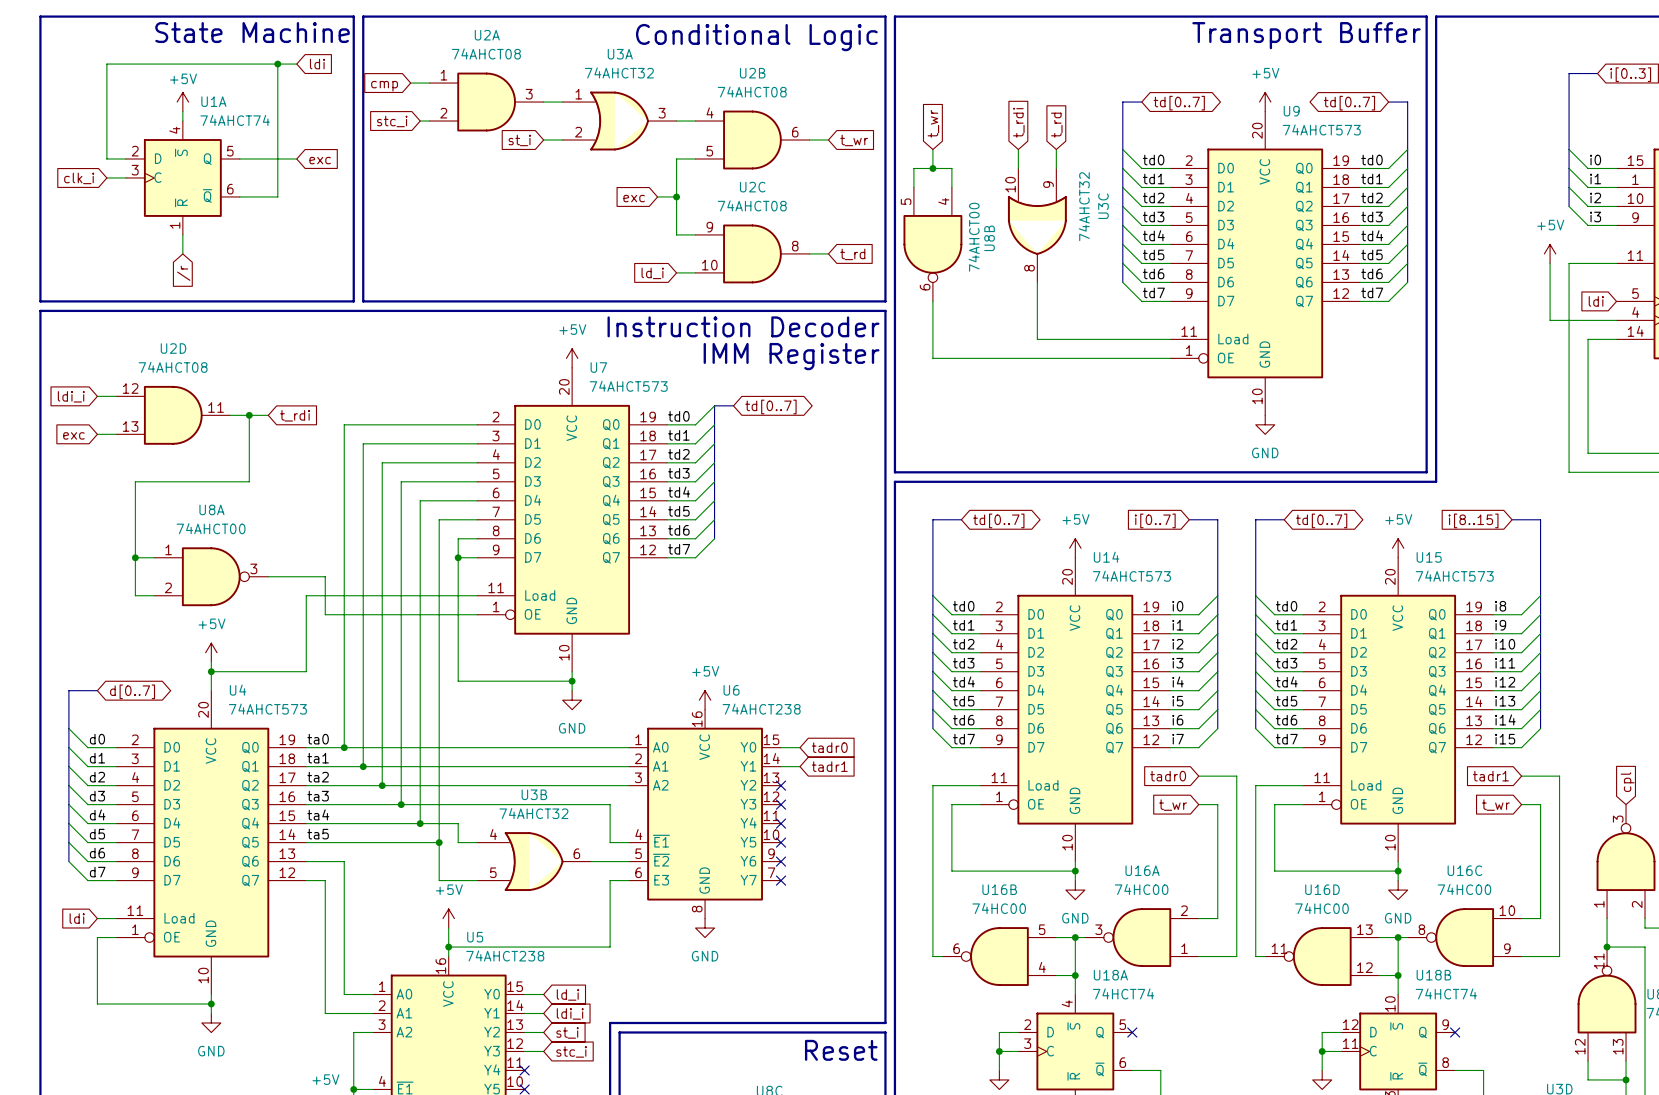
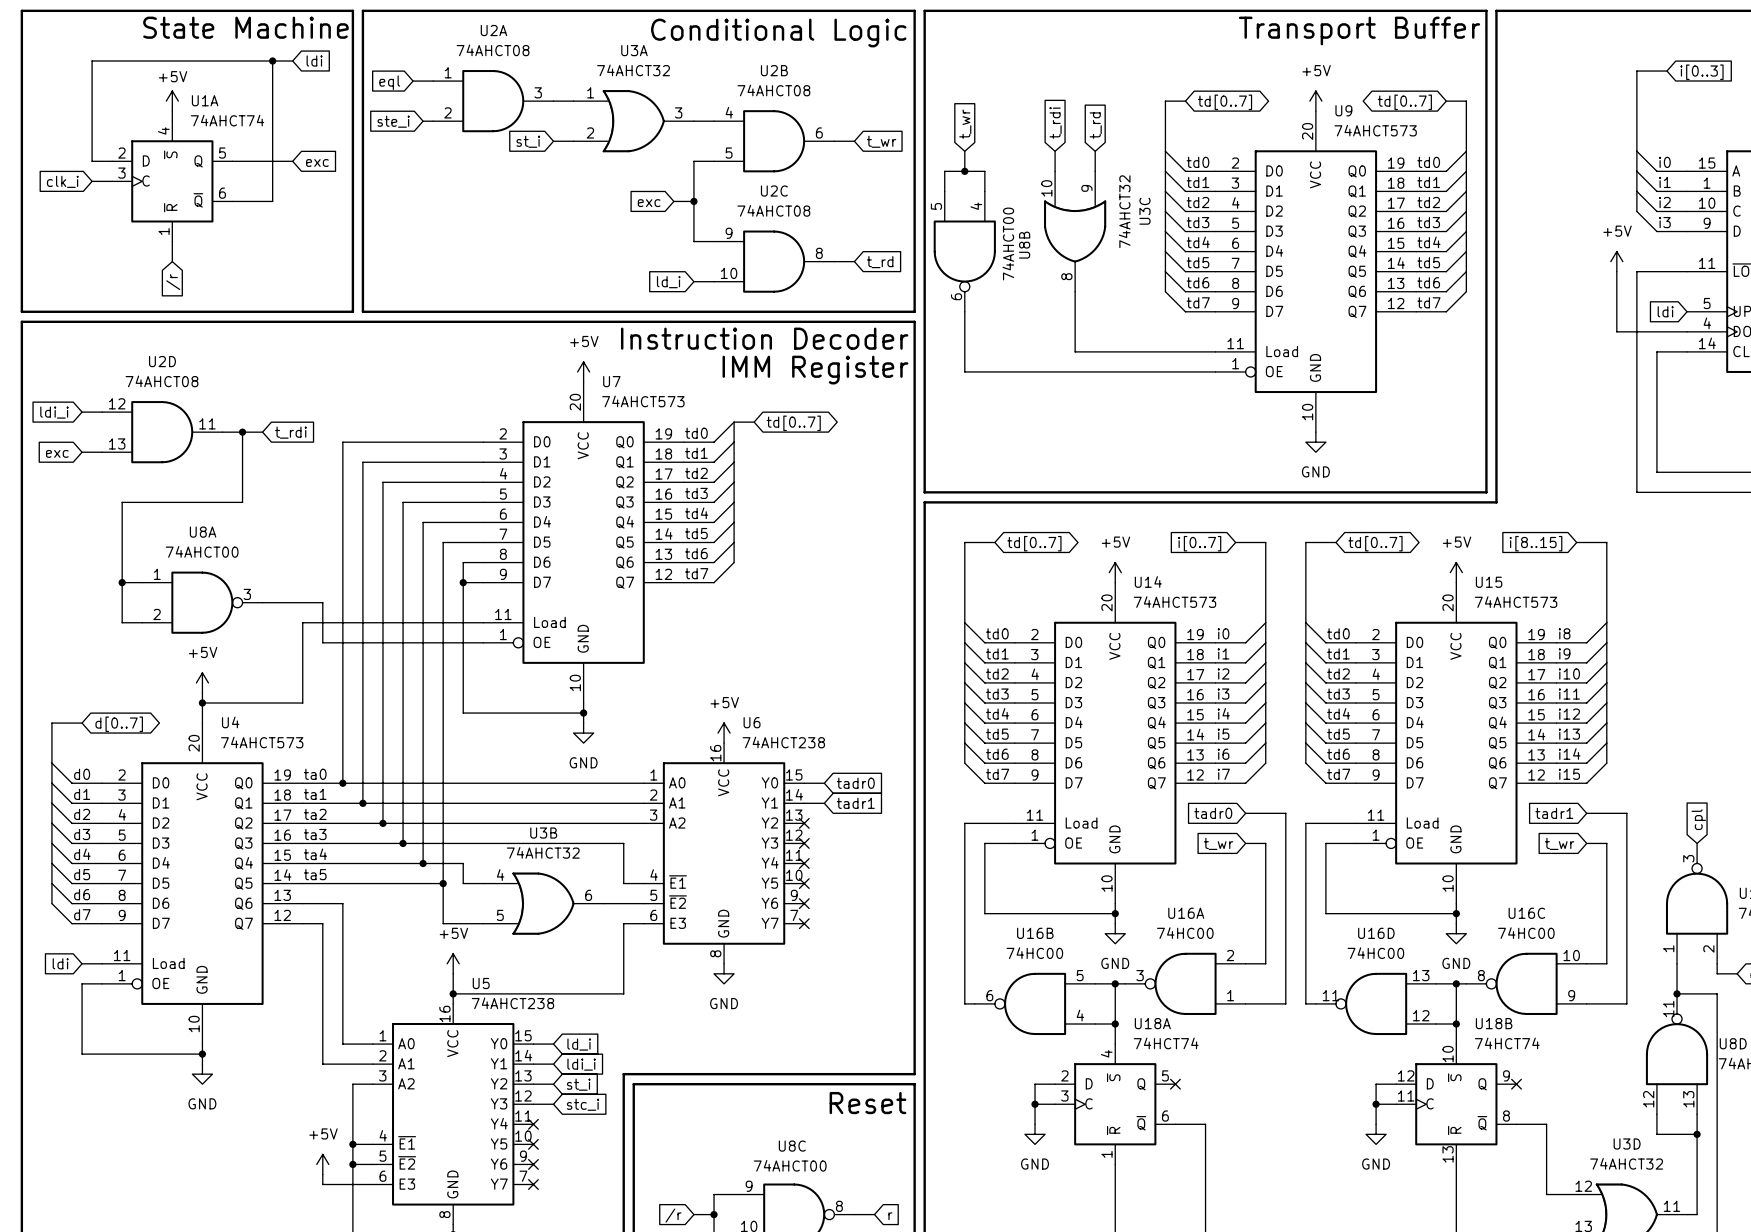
global label: cmp (384, 86) -> eql (389, 82)
global label: stc_i (392, 121) -> ste_i (393, 121)

